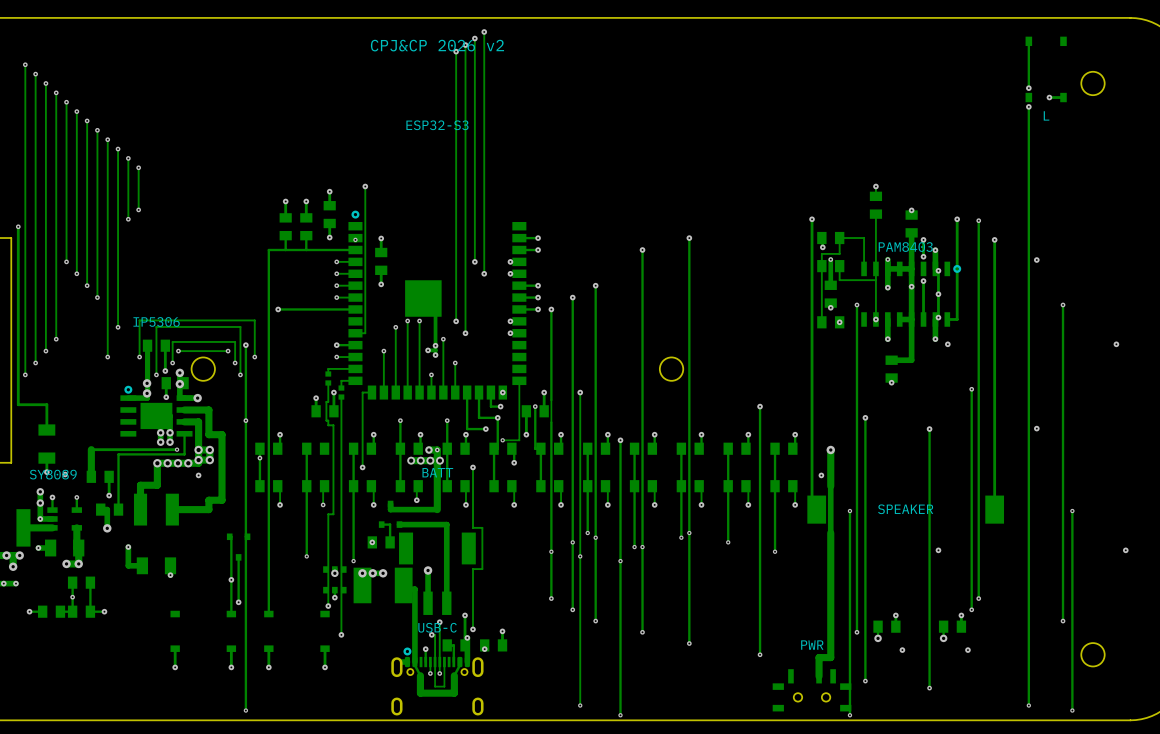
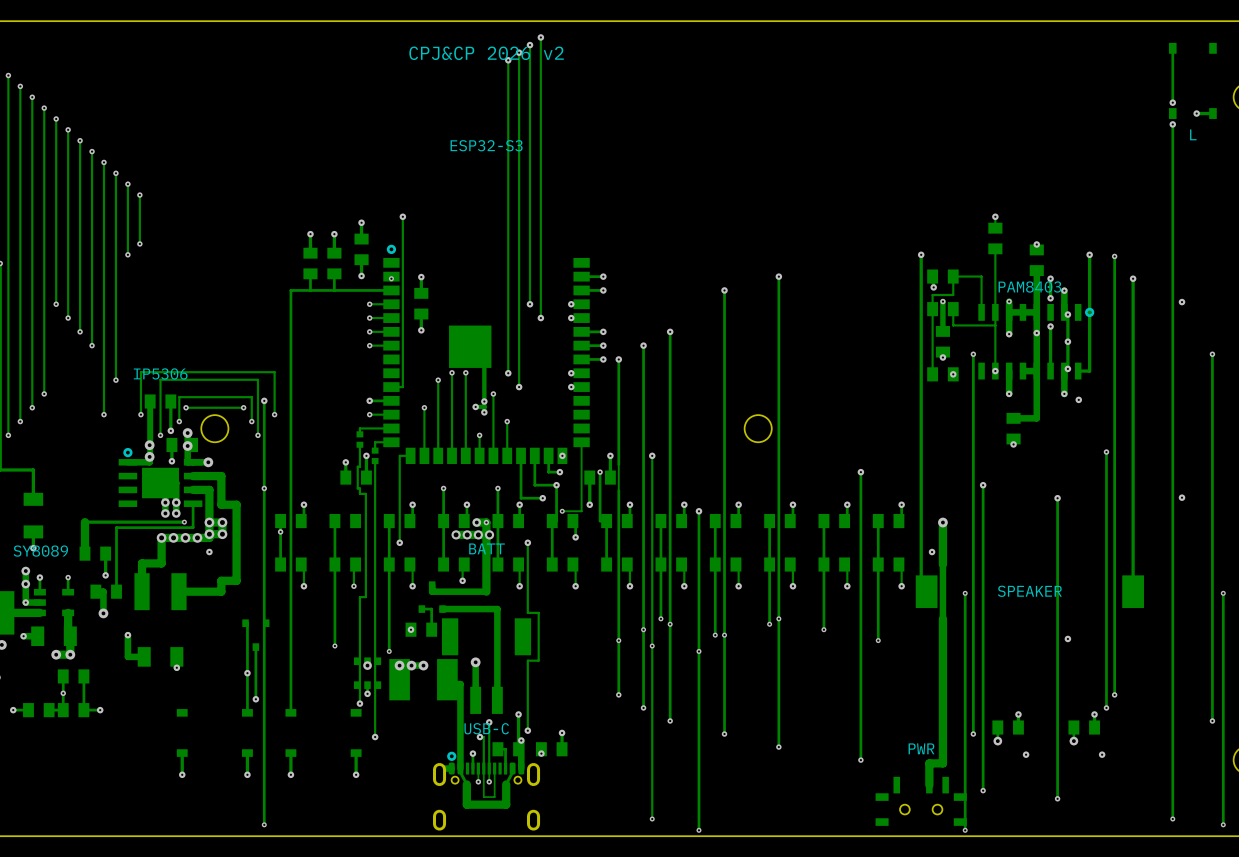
via: (278, 309) -> none
track: (355, 309) (278, 309) -> none
via: (65, 474) -> none

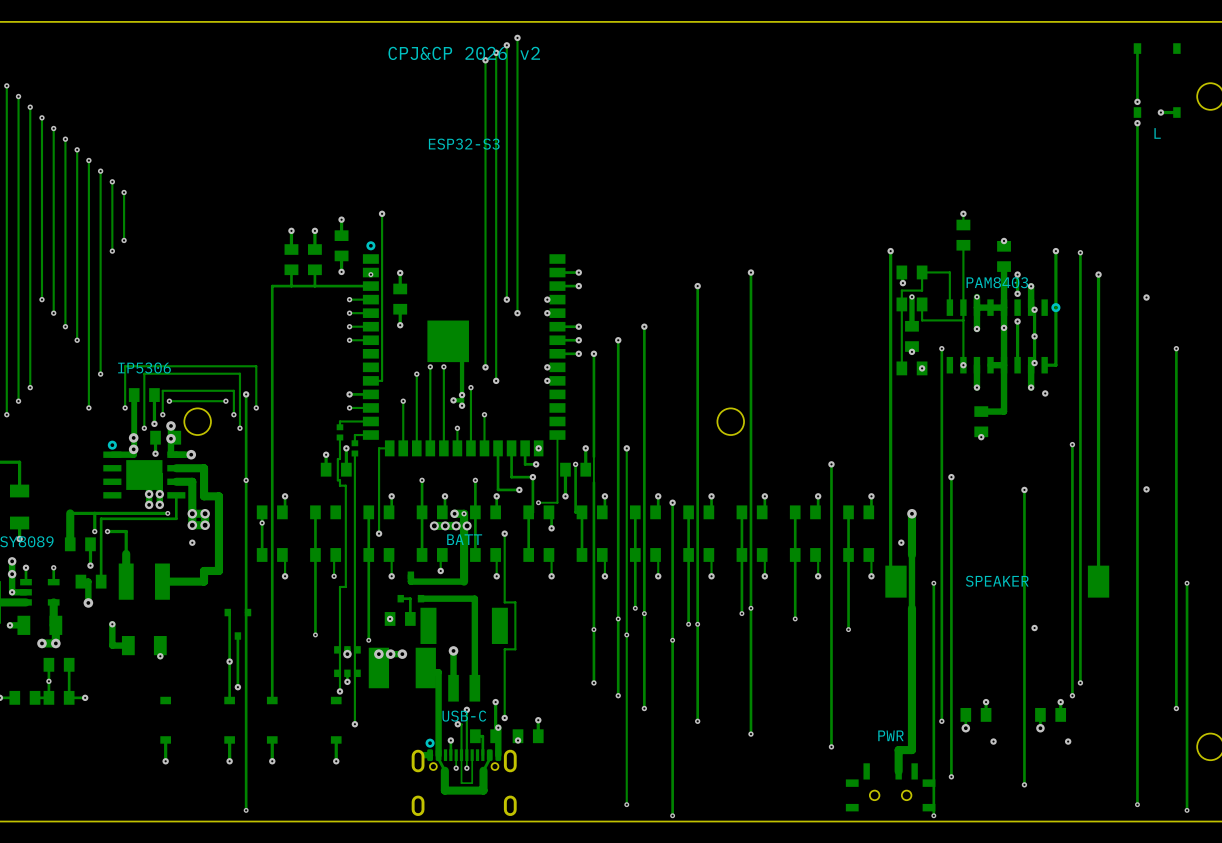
track: none -> (94, 513) (94, 531)
track: (209, 534) (209, 537) (161, 537) (161, 563) (142, 563) -> (107, 531) (126, 531) (126, 553)
via: (161, 537) -> none
via: (173, 537) -> none
via: (185, 537) -> none
via: (197, 537) -> none
via: none -> (94, 531)
via: none -> (107, 531)

